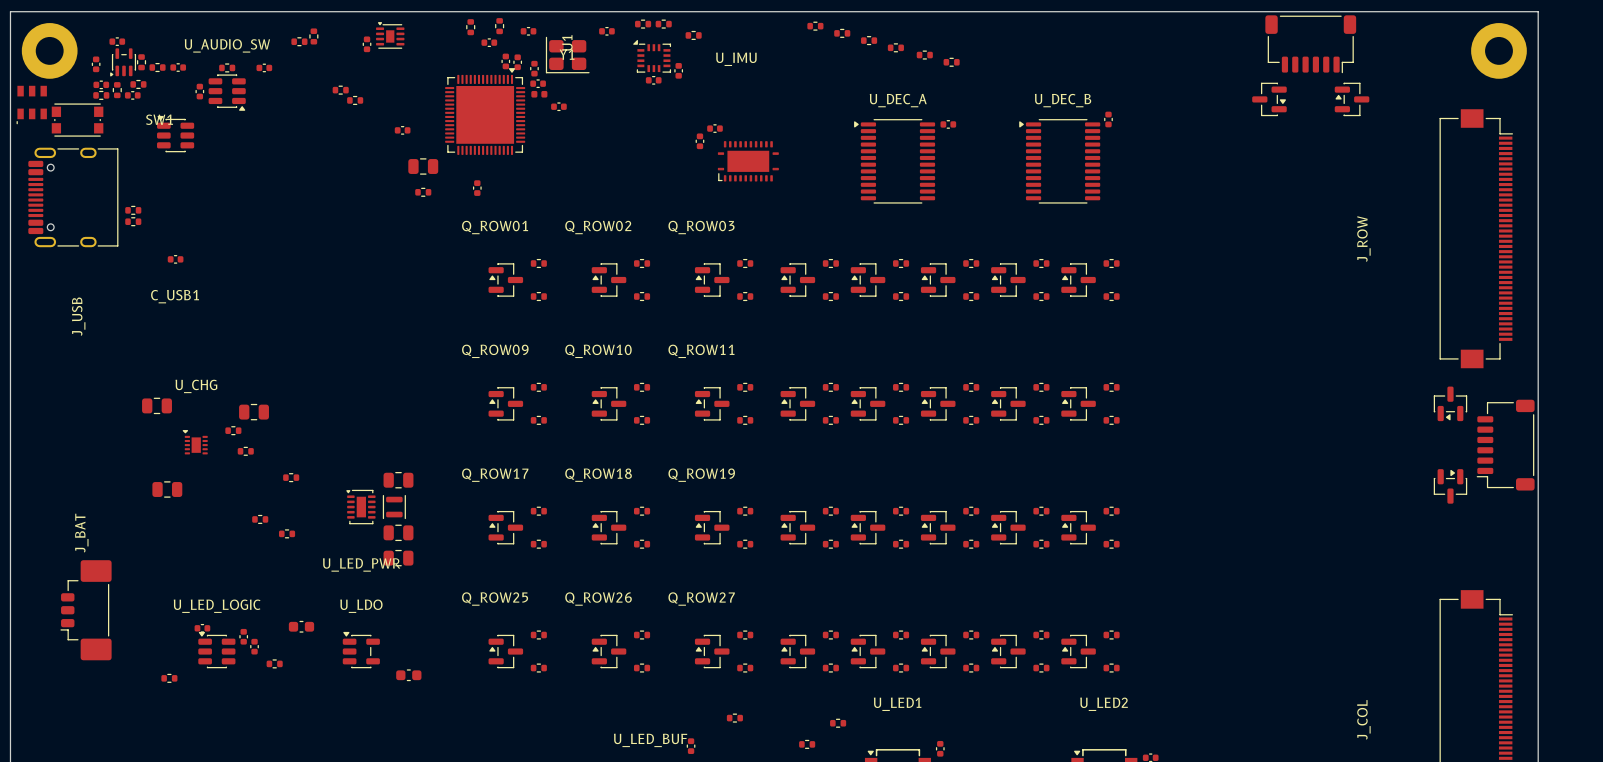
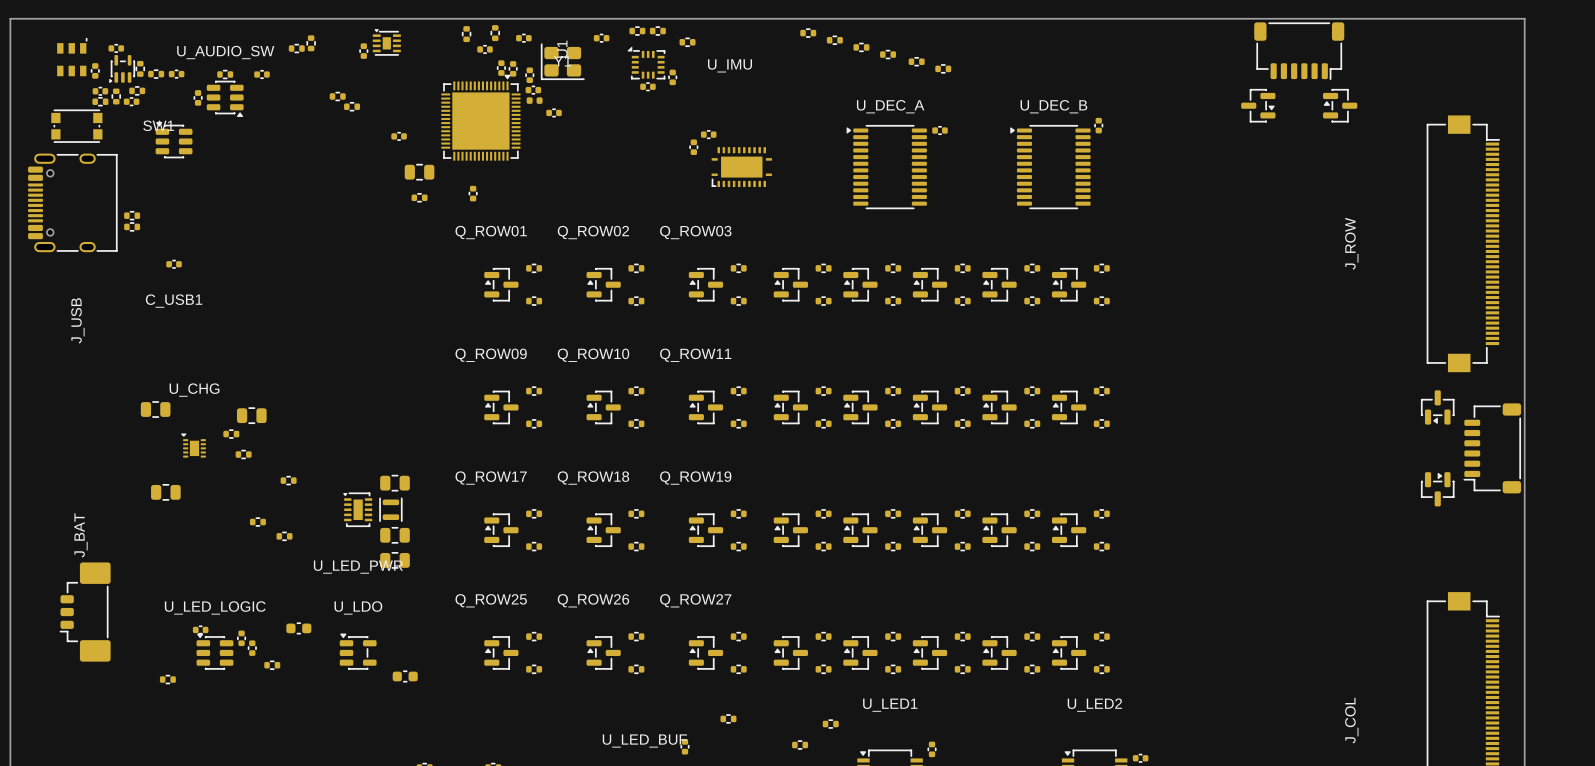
part: (49, 50) -> none
part: (1498, 50) -> none
part rotation: 0° (31, 105) -> 180° (72, 57)
part position: (31, 105) -> (72, 57)

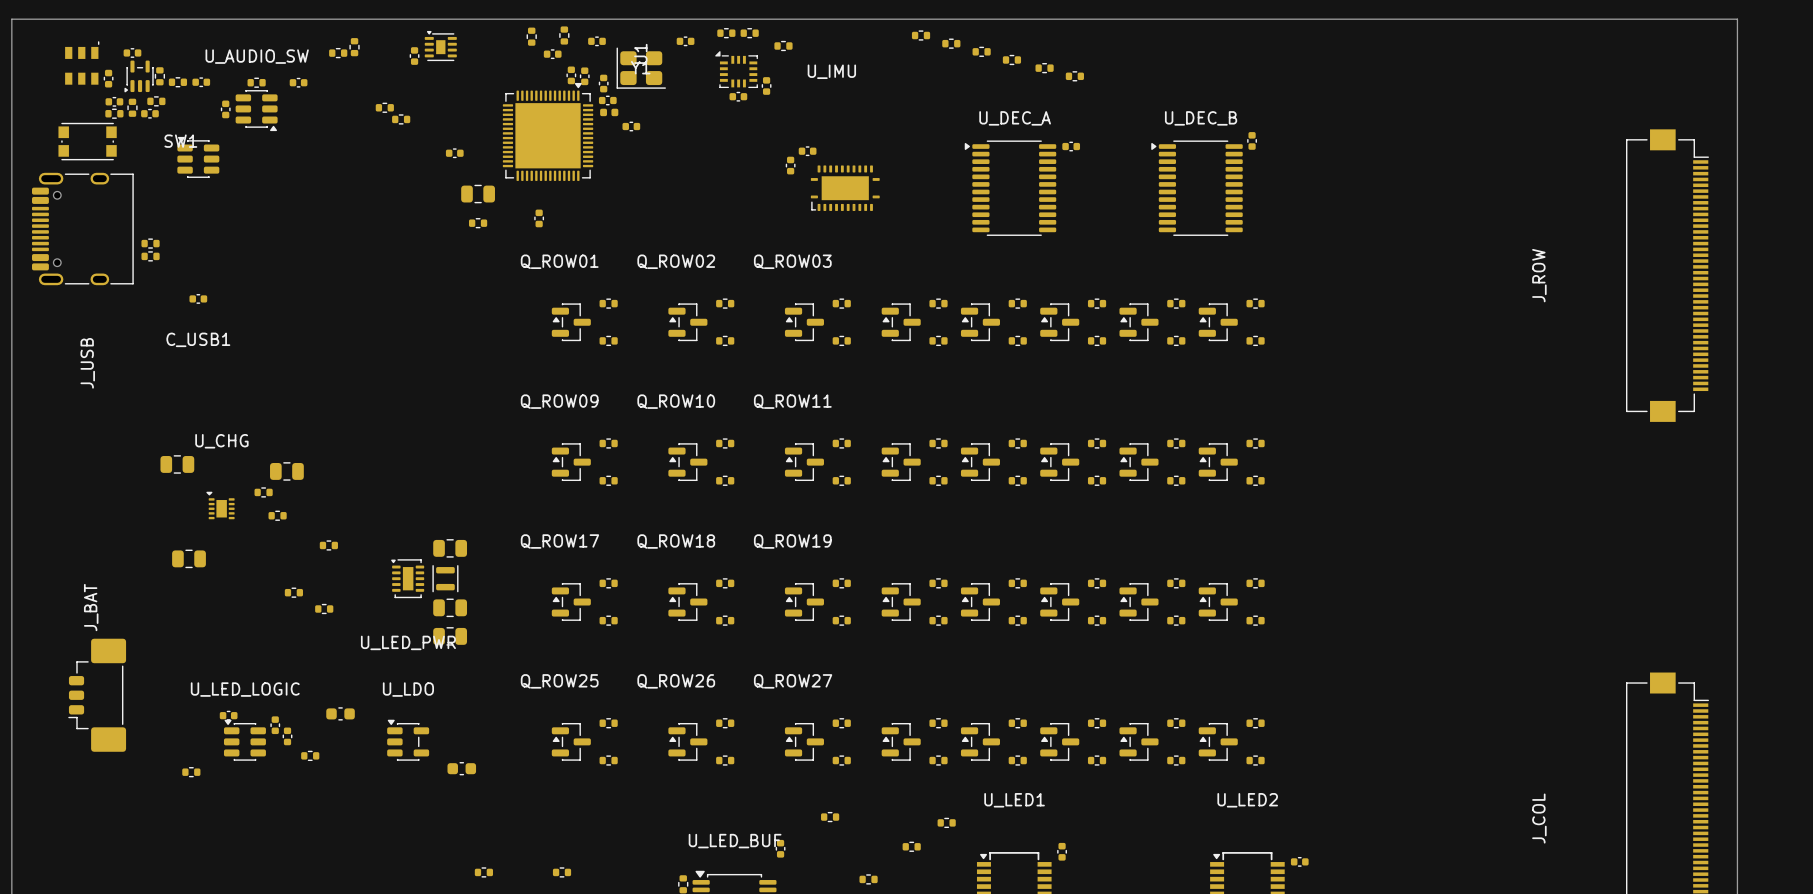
part: (1299, 51) -> none
part: (1258, 105) -> none
part: (1340, 105) -> none
part: (1437, 407) -> none
part: (1492, 448) -> none
part: (1437, 489) -> none

